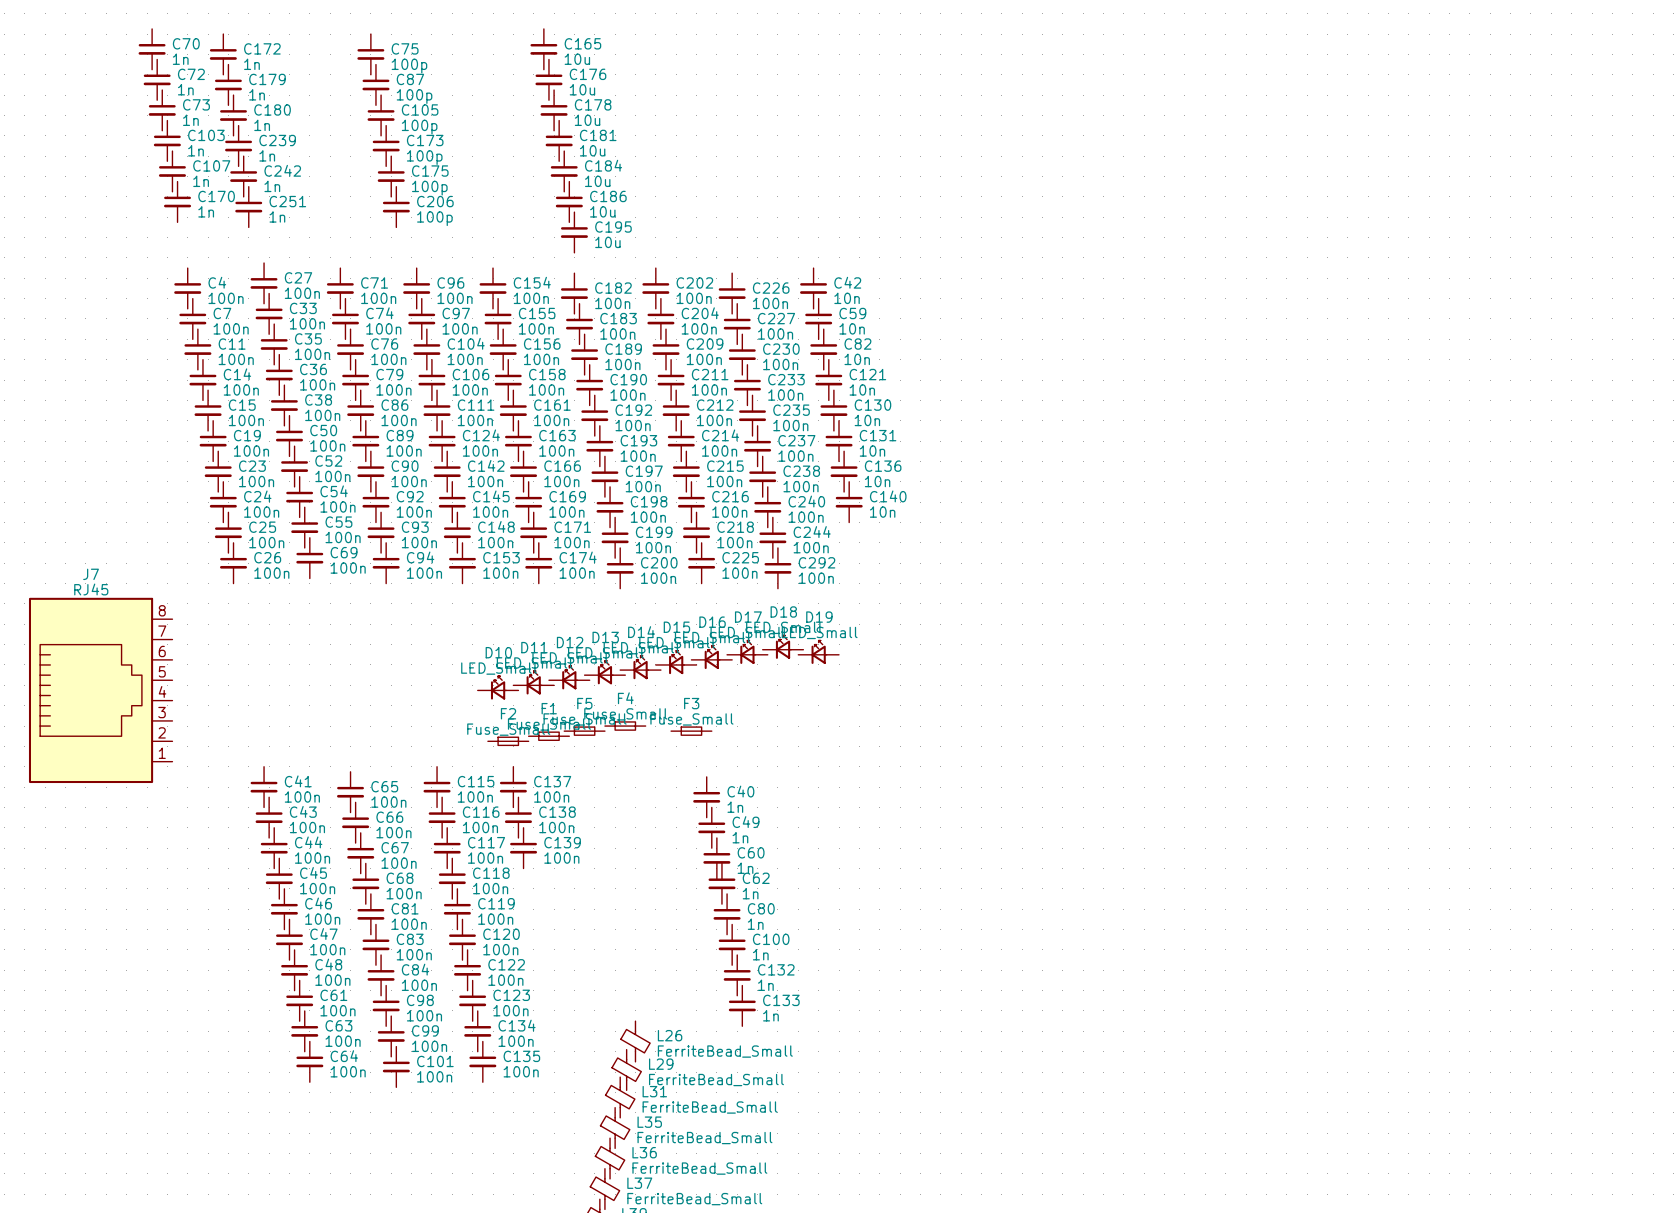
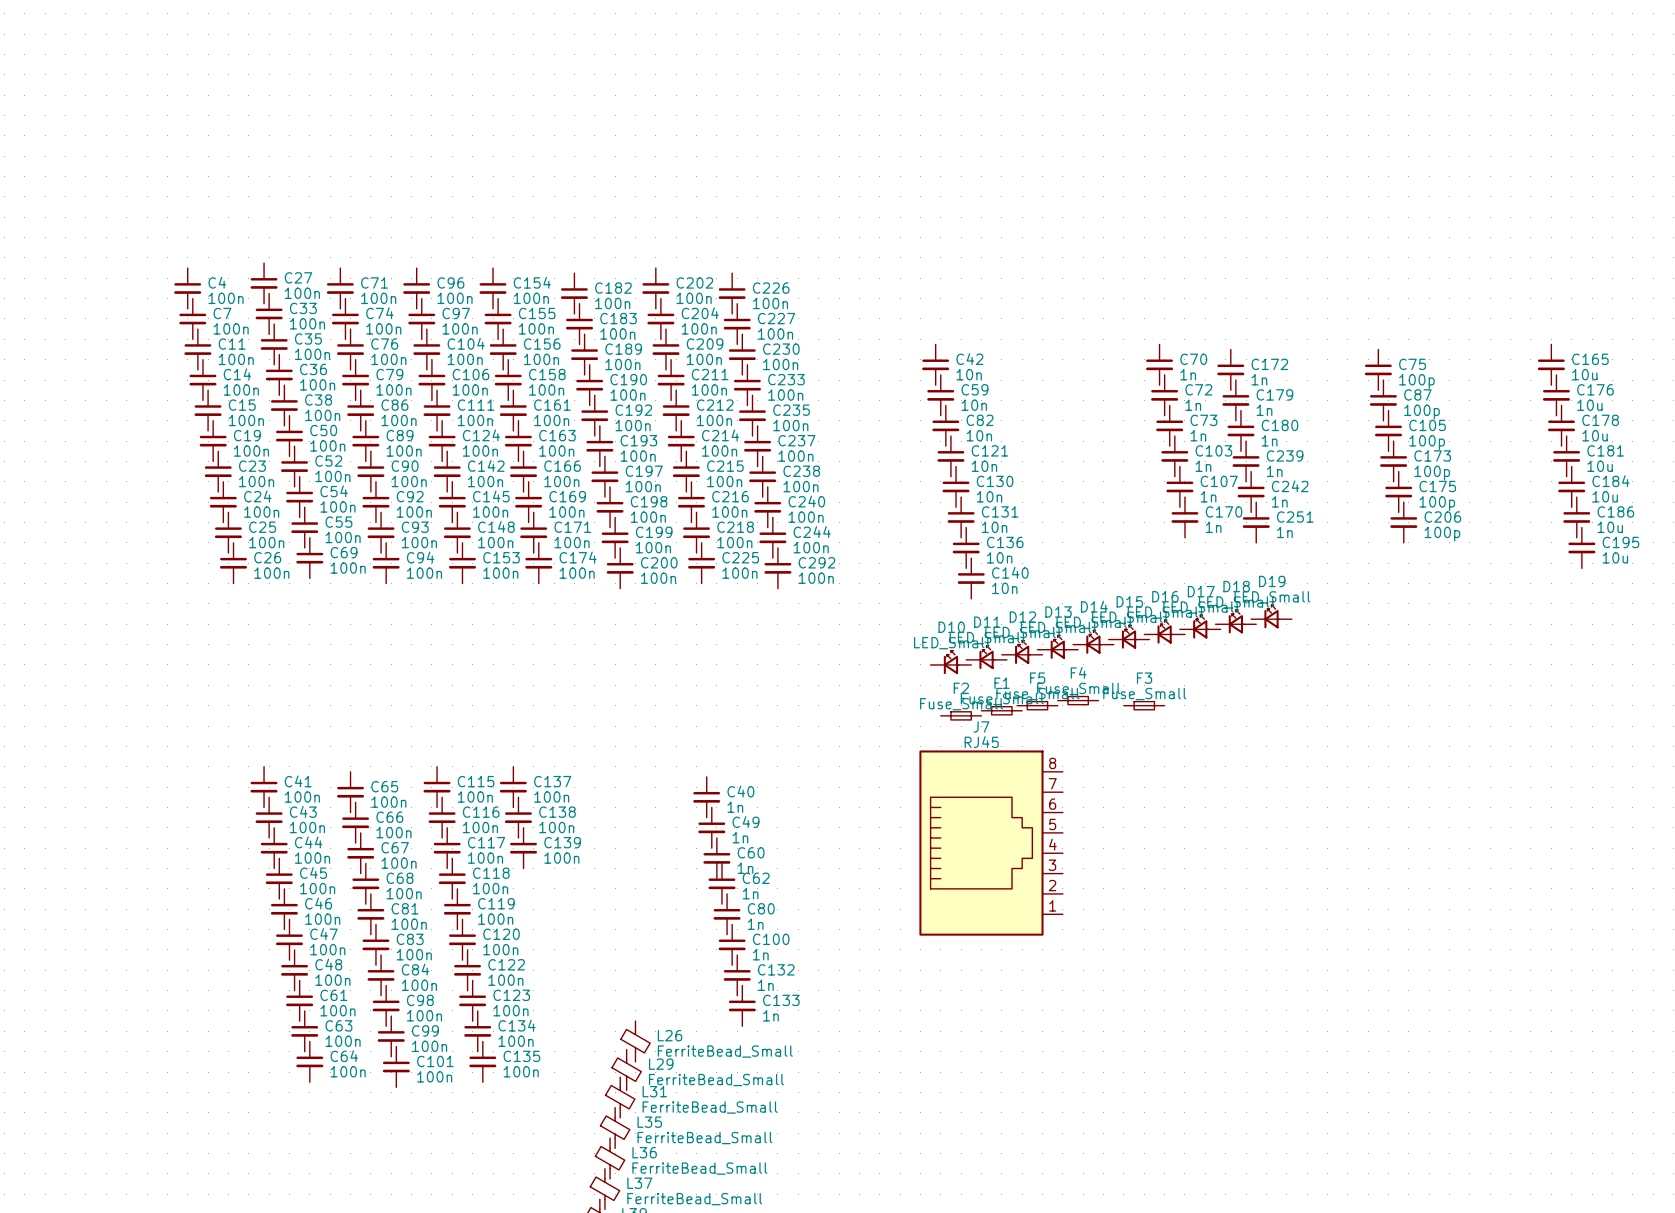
C70 position: (152, 49) -> (1159, 364)
C165 position: (543, 49) -> (1551, 364)
C172 position: (223, 54) -> (1230, 369)
C75 position: (370, 54) -> (1378, 369)
C72 position: (157, 79) -> (1164, 395)
C176 position: (548, 79) -> (1556, 395)
C179 position: (228, 84) -> (1235, 400)
C87 position: (375, 84) -> (1383, 400)
C73 position: (162, 110) -> (1169, 425)
C178 position: (554, 110) -> (1561, 425)
C180 position: (233, 115) -> (1240, 430)
C105 position: (381, 115) -> (1388, 430)
C103 position: (167, 140) -> (1174, 456)
C181 position: (559, 140) -> (1566, 456)
C239 position: (238, 145) -> (1246, 461)
C173 position: (386, 145) -> (1393, 461)
C107 position: (172, 171) -> (1179, 486)
C184 position: (564, 171) -> (1571, 486)
C242 position: (243, 176) -> (1251, 491)
C175 position: (391, 176) -> (1398, 491)
C170 position: (177, 201) -> (1184, 517)
C186 position: (569, 201) -> (1576, 517)
C251 position: (248, 207) -> (1256, 522)
C206 position: (396, 207) -> (1403, 522)
C195 position: (574, 232) -> (1581, 547)
C42 position: (813, 288) -> (935, 364)
C59 position: (818, 318) -> (940, 395)
C82 position: (823, 349) -> (945, 425)
C121 position: (828, 380) -> (950, 456)
C130 position: (833, 410) -> (956, 486)
C131 position: (839, 441) -> (961, 517)
C136 position: (844, 471) -> (966, 547)
C140 position: (849, 502) -> (971, 578)
D18 position: (783, 647) -> (1235, 621)
D17 position: (747, 652) -> (1200, 626)
D19 position: (818, 652) -> (1271, 616)
D16 position: (711, 657) -> (1164, 631)
D15 position: (676, 662) -> (1129, 637)
D14 position: (640, 667) -> (1093, 642)
D13 position: (604, 672) -> (1057, 647)
D12 position: (569, 677) -> (1022, 652)
D11 position: (533, 682) -> (986, 657)
D10 position: (498, 687) -> (950, 662)
J7 position: (100, 690) -> (991, 843)
F4 position: (625, 726) -> (1078, 700)
F5 position: (584, 731) -> (1037, 705)
F3 position: (691, 731) -> (1144, 705)
F1 position: (548, 736) -> (1001, 710)
F2 position: (508, 741) -> (961, 715)

